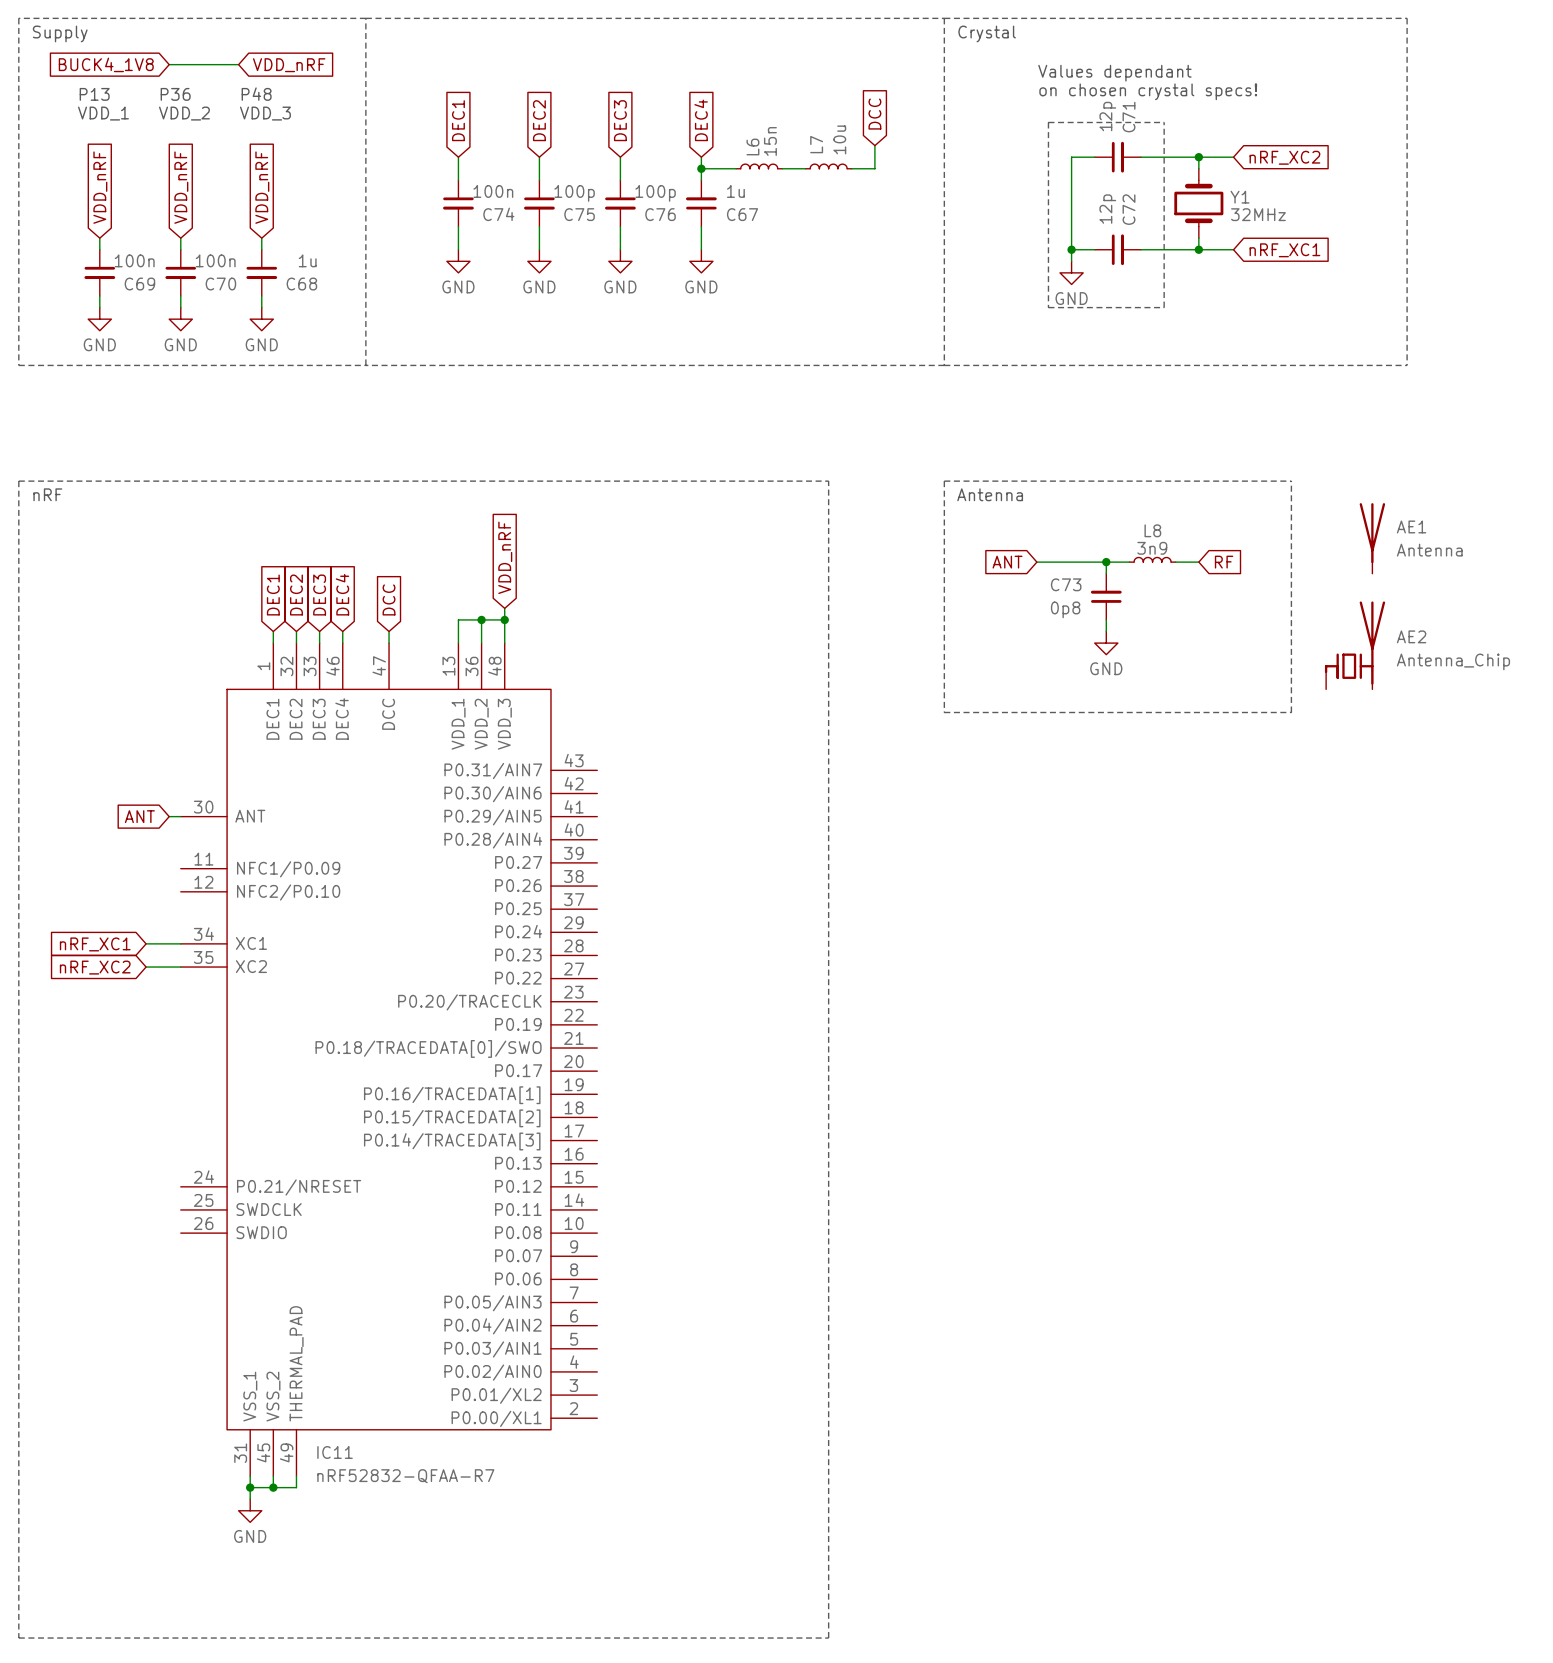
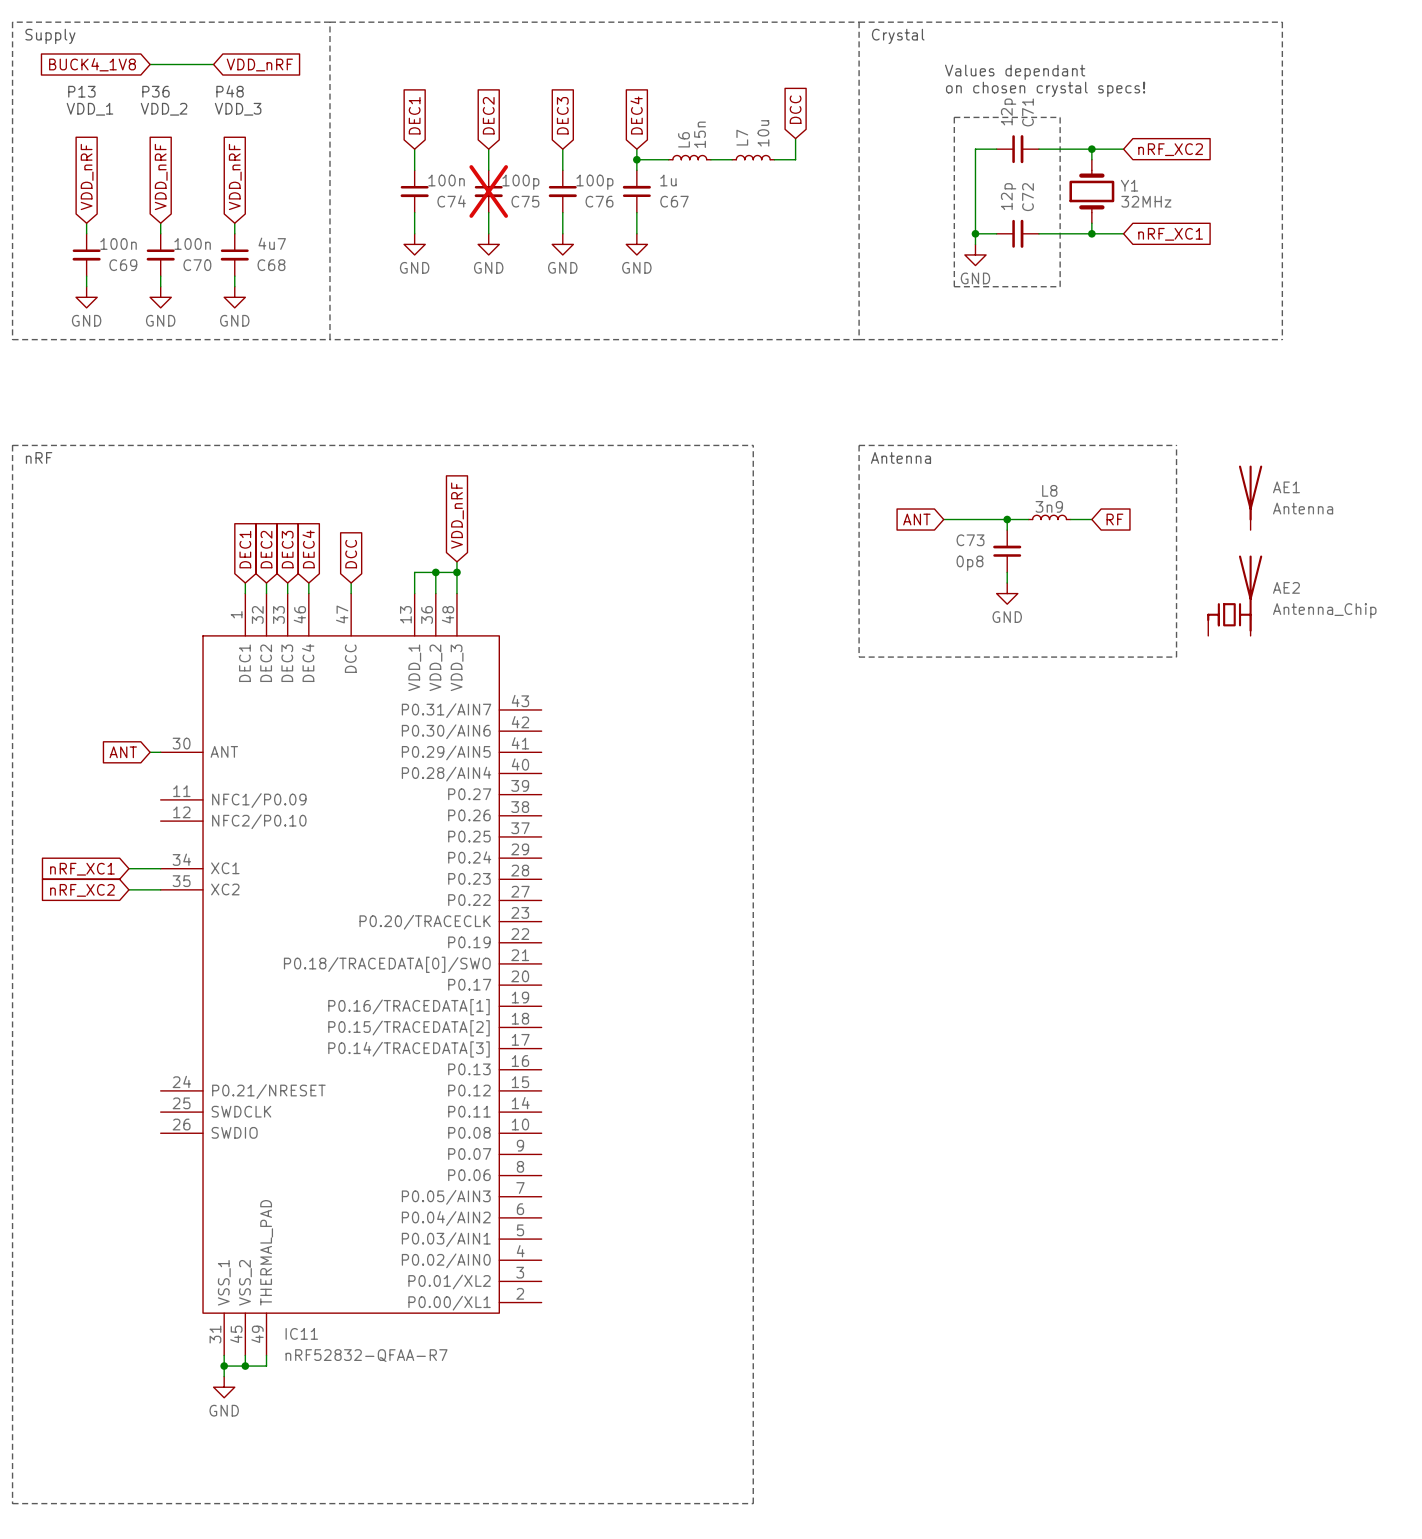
C75 do-not-place cross: none -> (488, 191)
C68 value: 1u (307, 260) -> 4u7 (272, 243)

